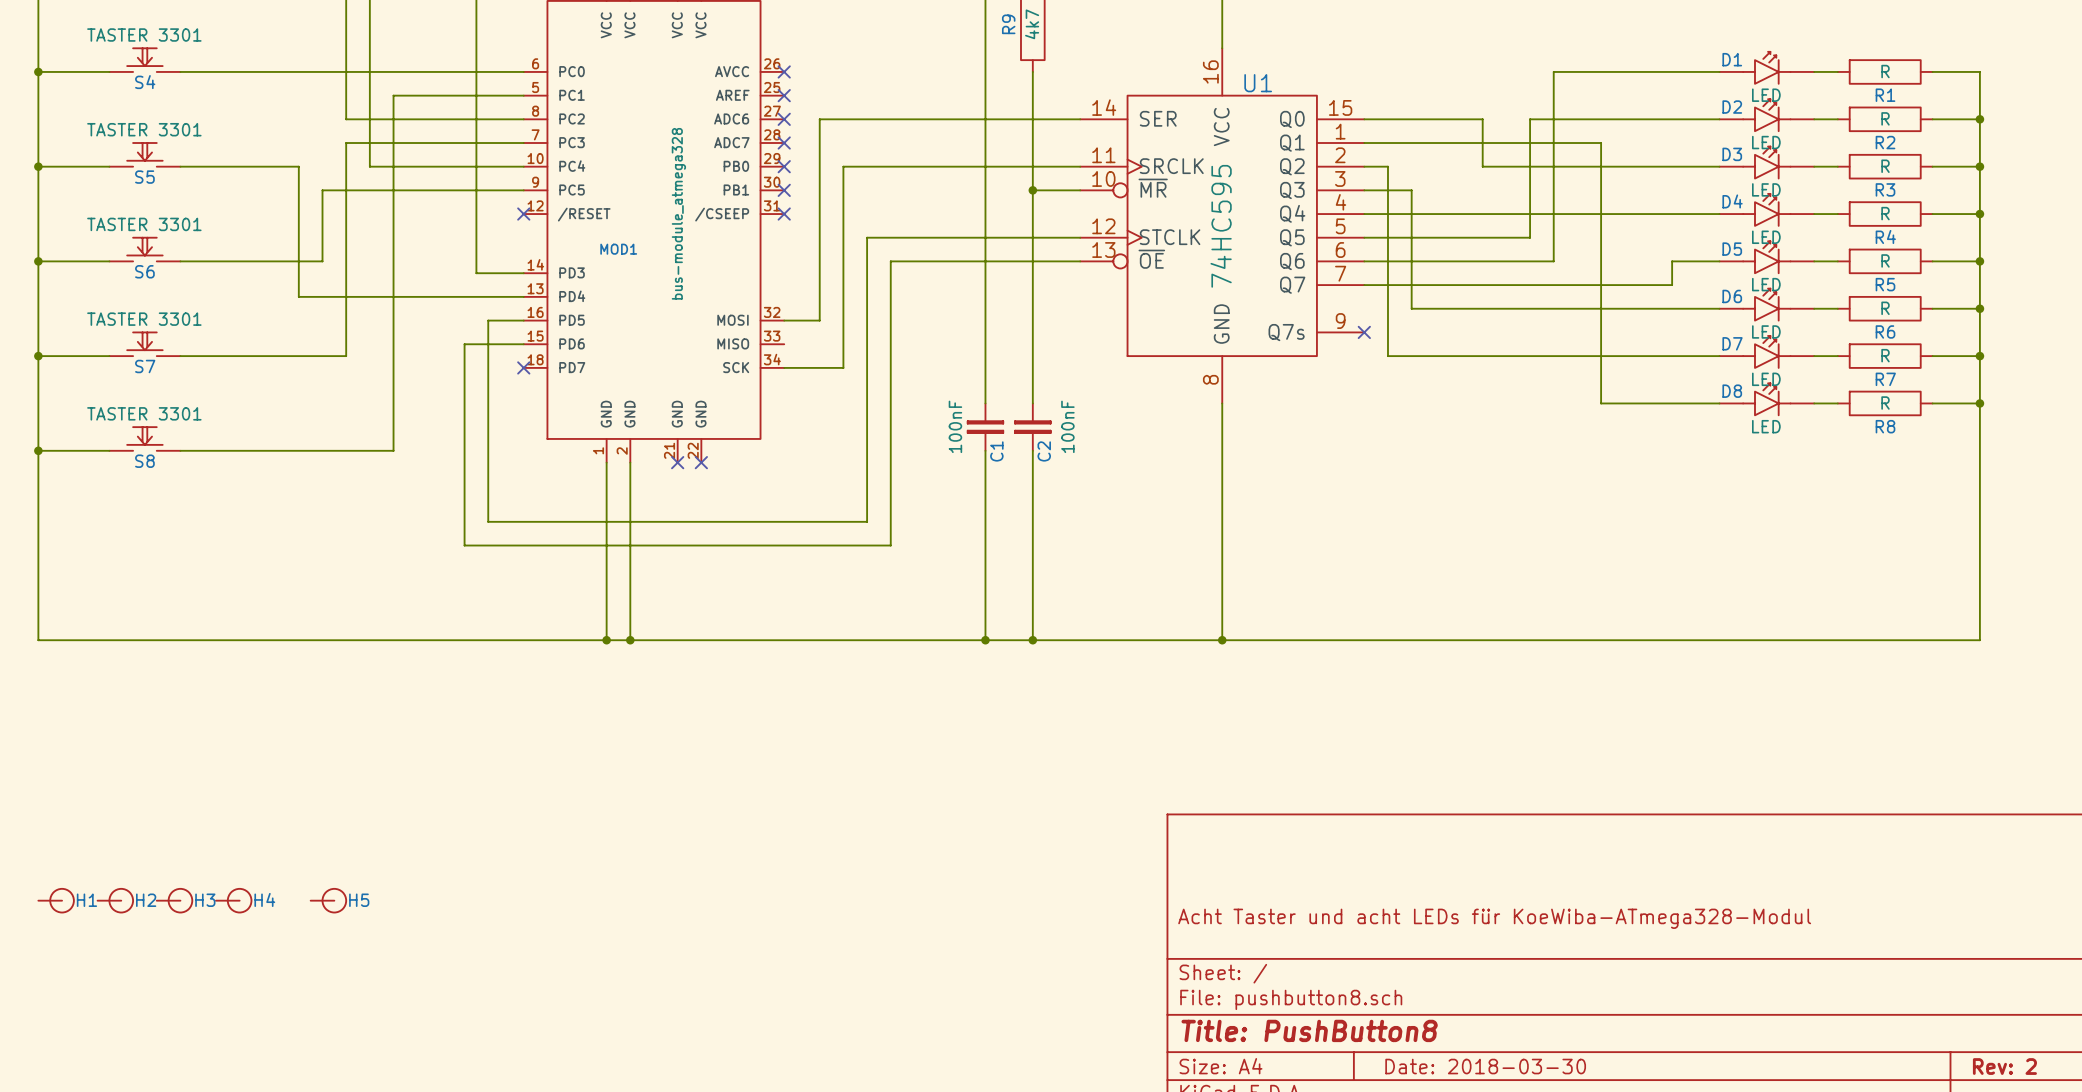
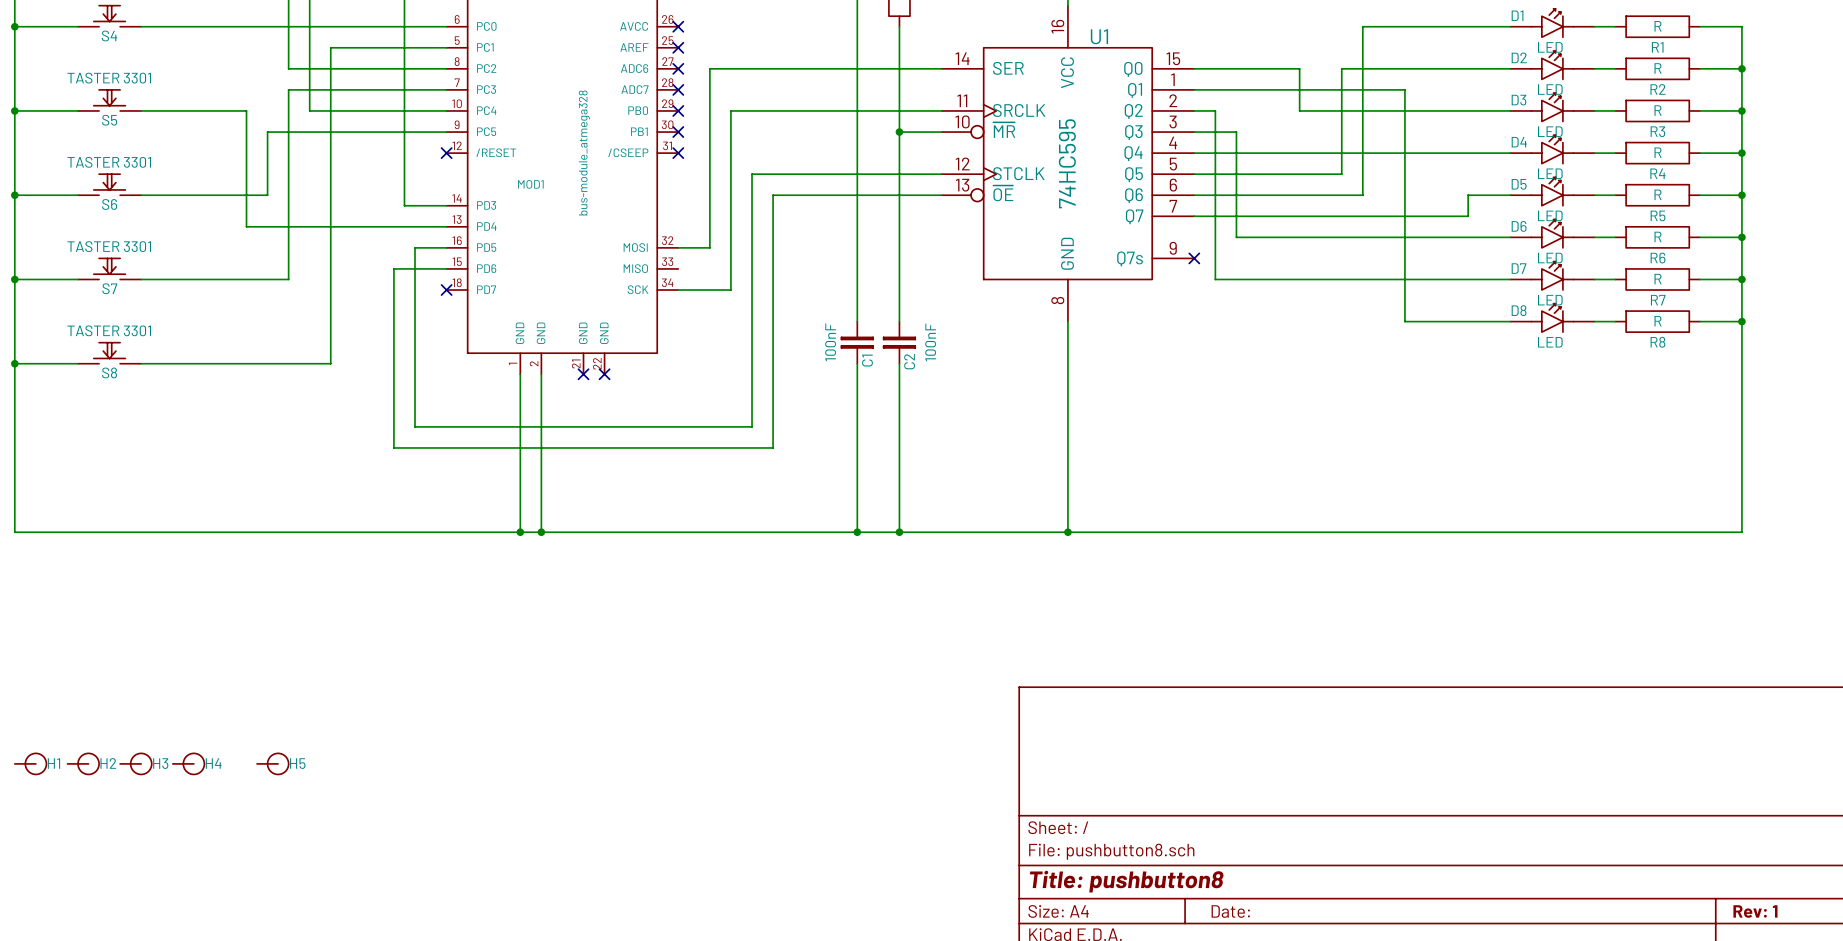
title block: Acht Taster und acht LEDs für KoeWiba-ATmega328-Modul (1494, 918) -> none
title block: Title: PushButton8 (1309, 1030) -> Title: pushbutton8 (1126, 881)
title block: Date: 2018-03-30 (1485, 1066) -> Date: (1230, 911)
title block: Rev: 2 (2004, 1066) -> Rev: 1 (1755, 911)

